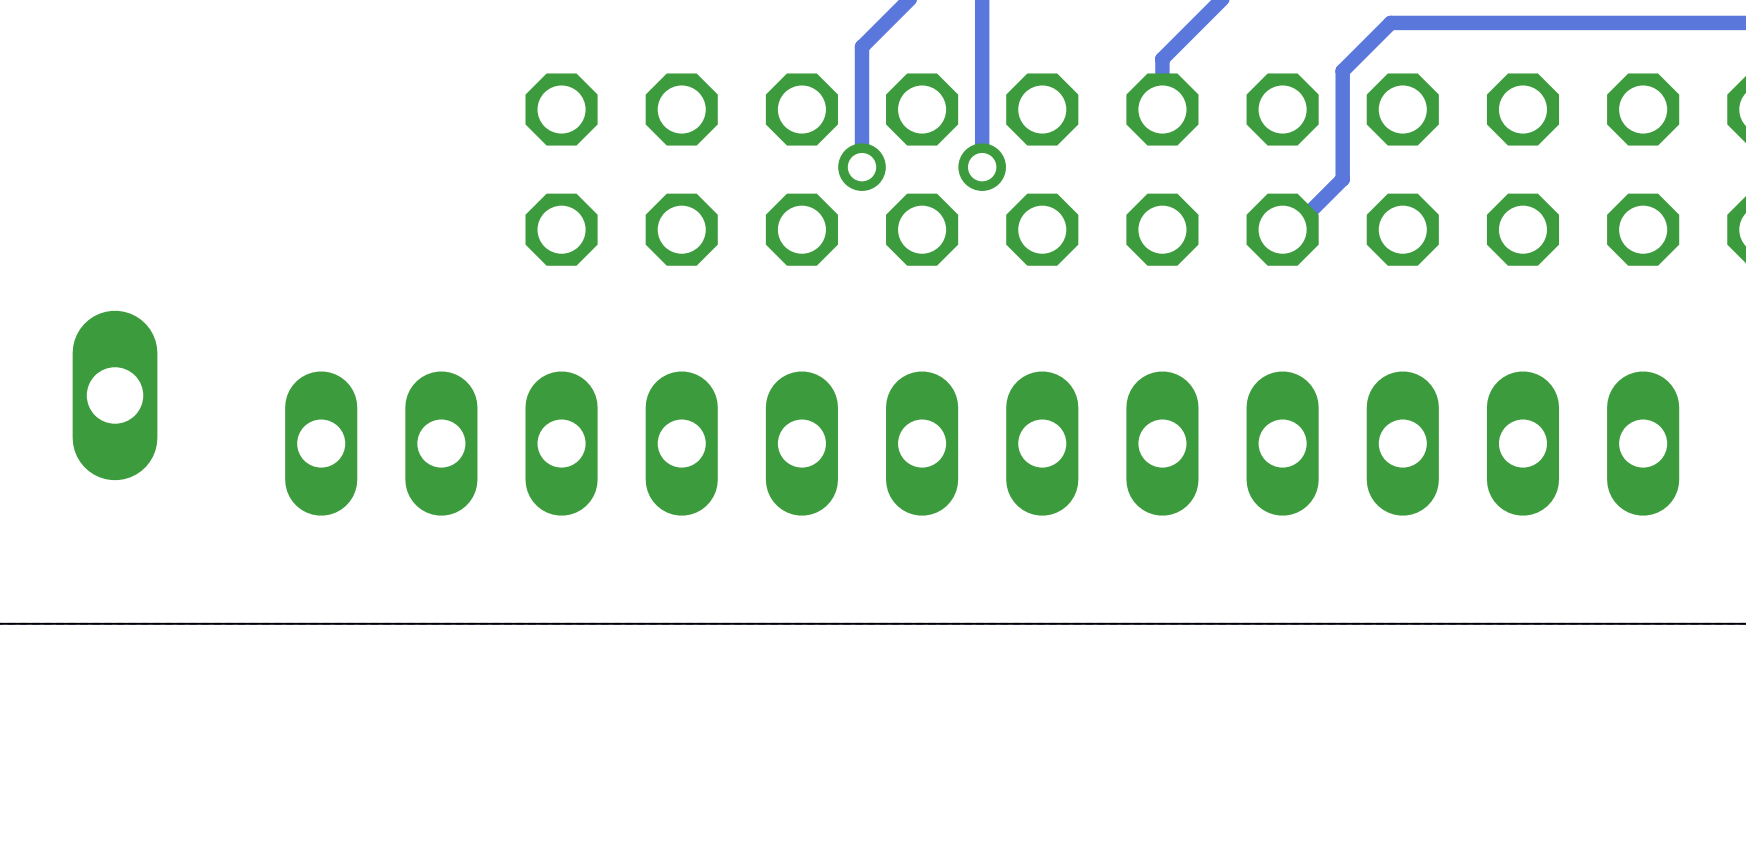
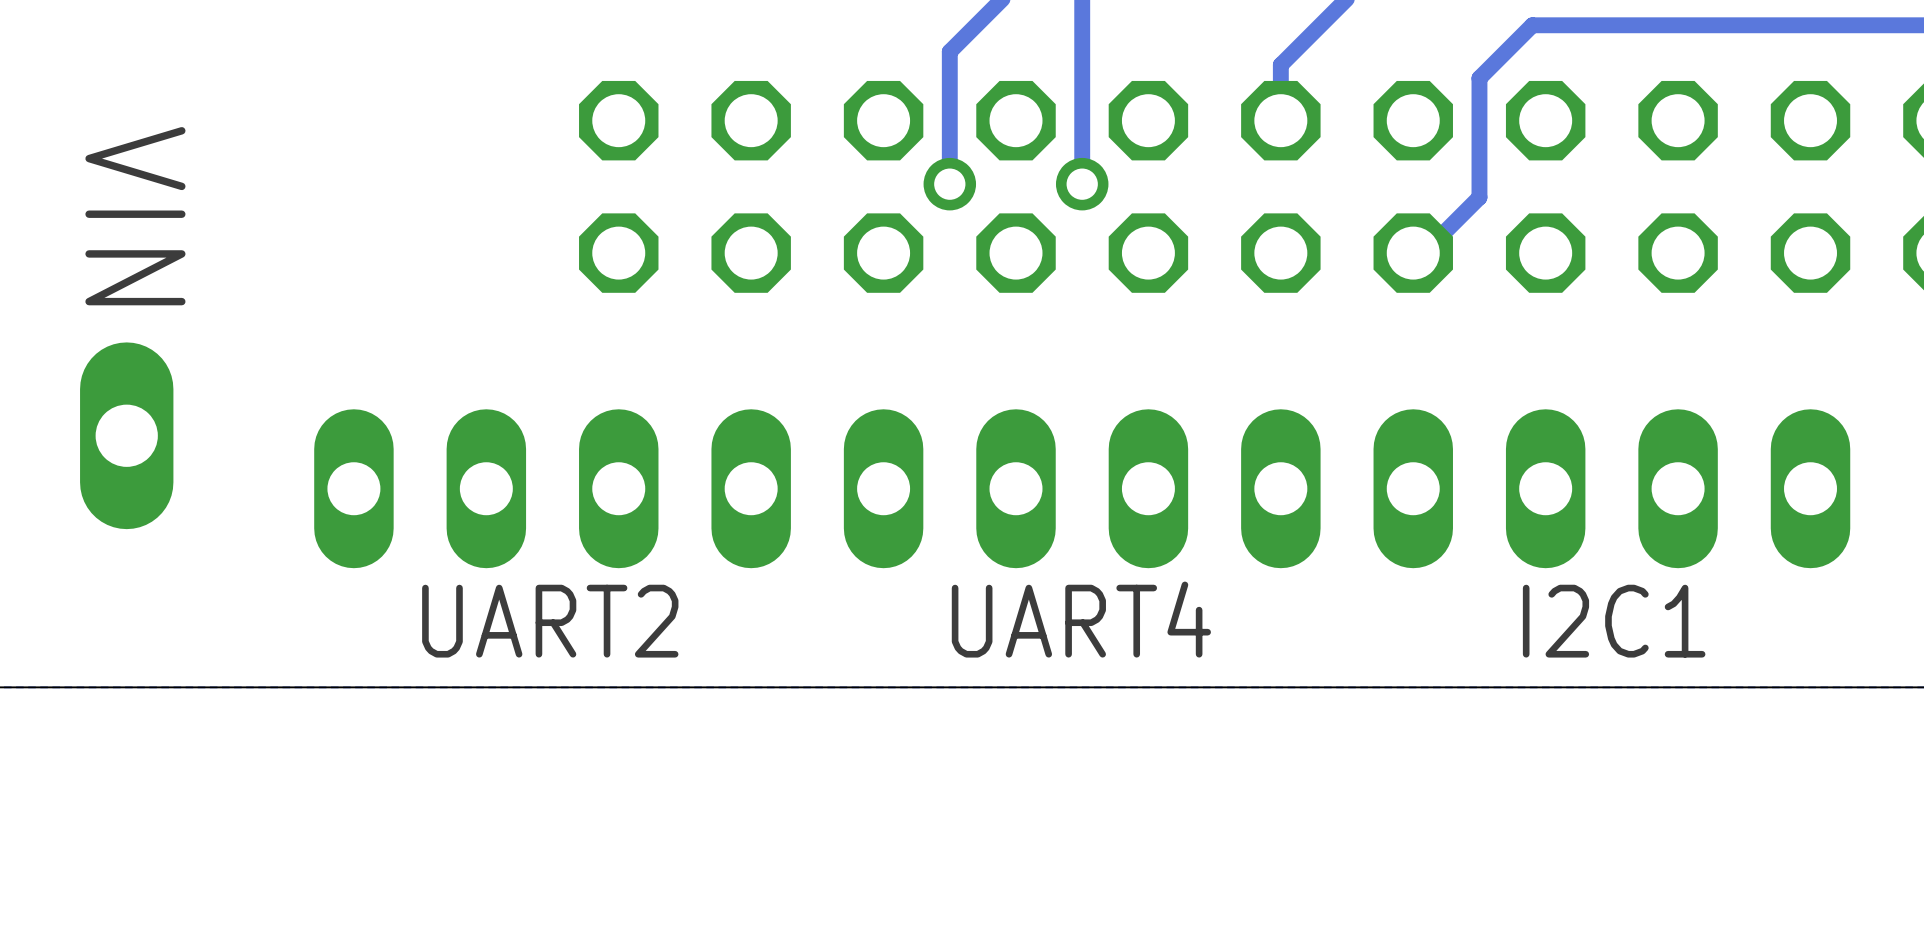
text: none -> VIN (135, 216)
UART4 name: none -> UART4 (1081, 619)
UART2 name: none -> UART2 (550, 621)
I2C1 name: none -> I2C1 (1614, 621)

